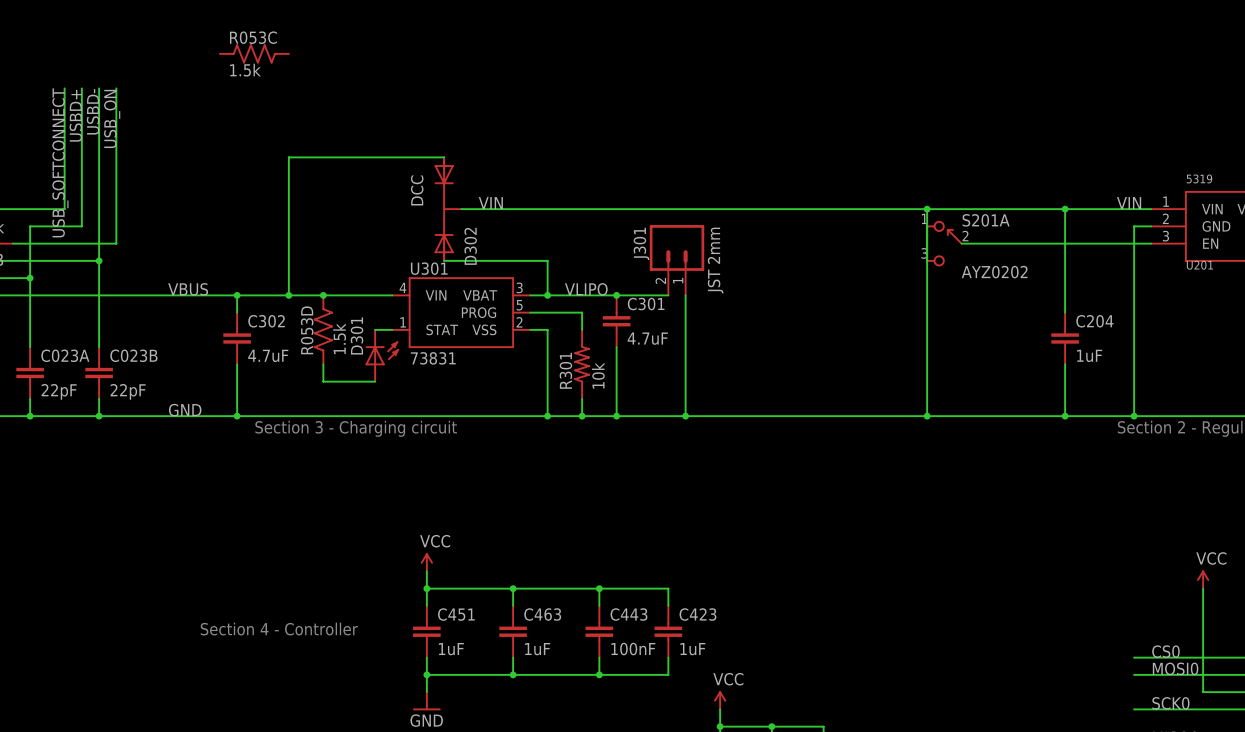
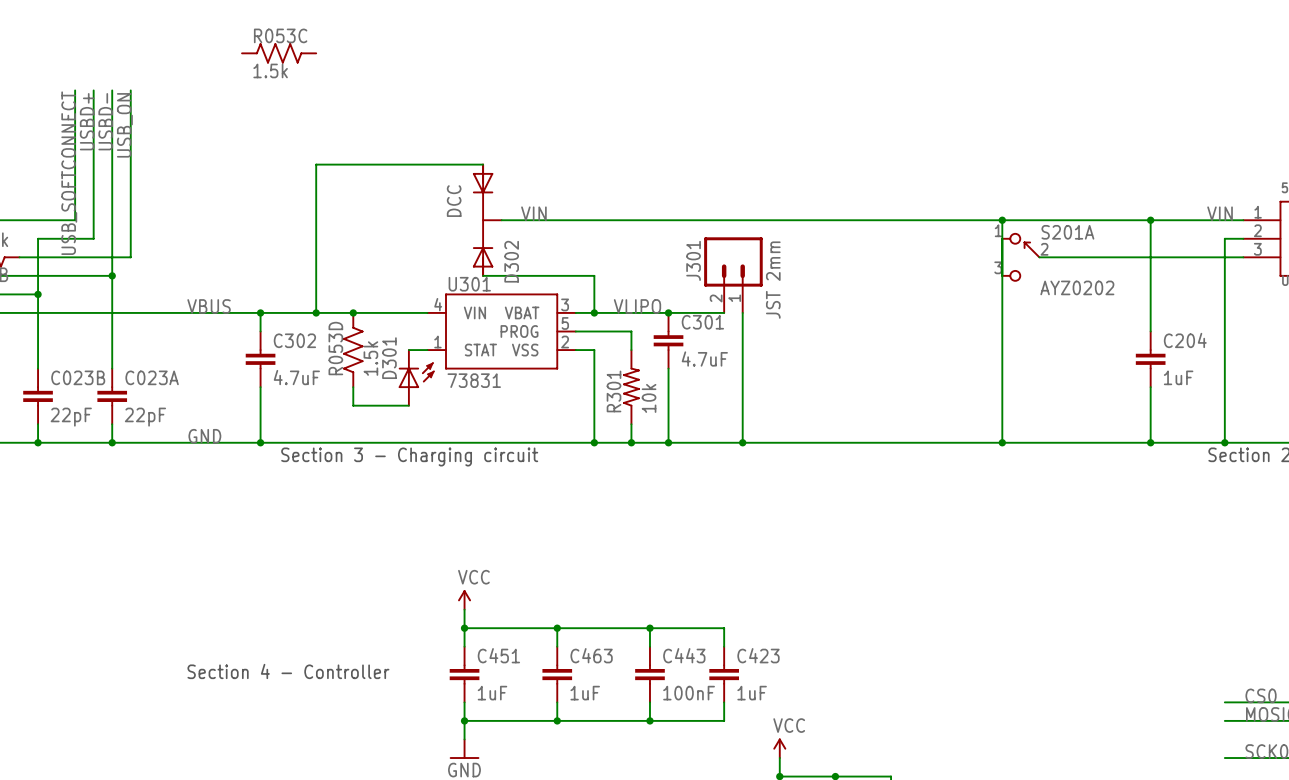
C023A name: C023A (65, 355) -> C023B (78, 377)
C023B name: C023B (133, 355) -> C023A (152, 377)

